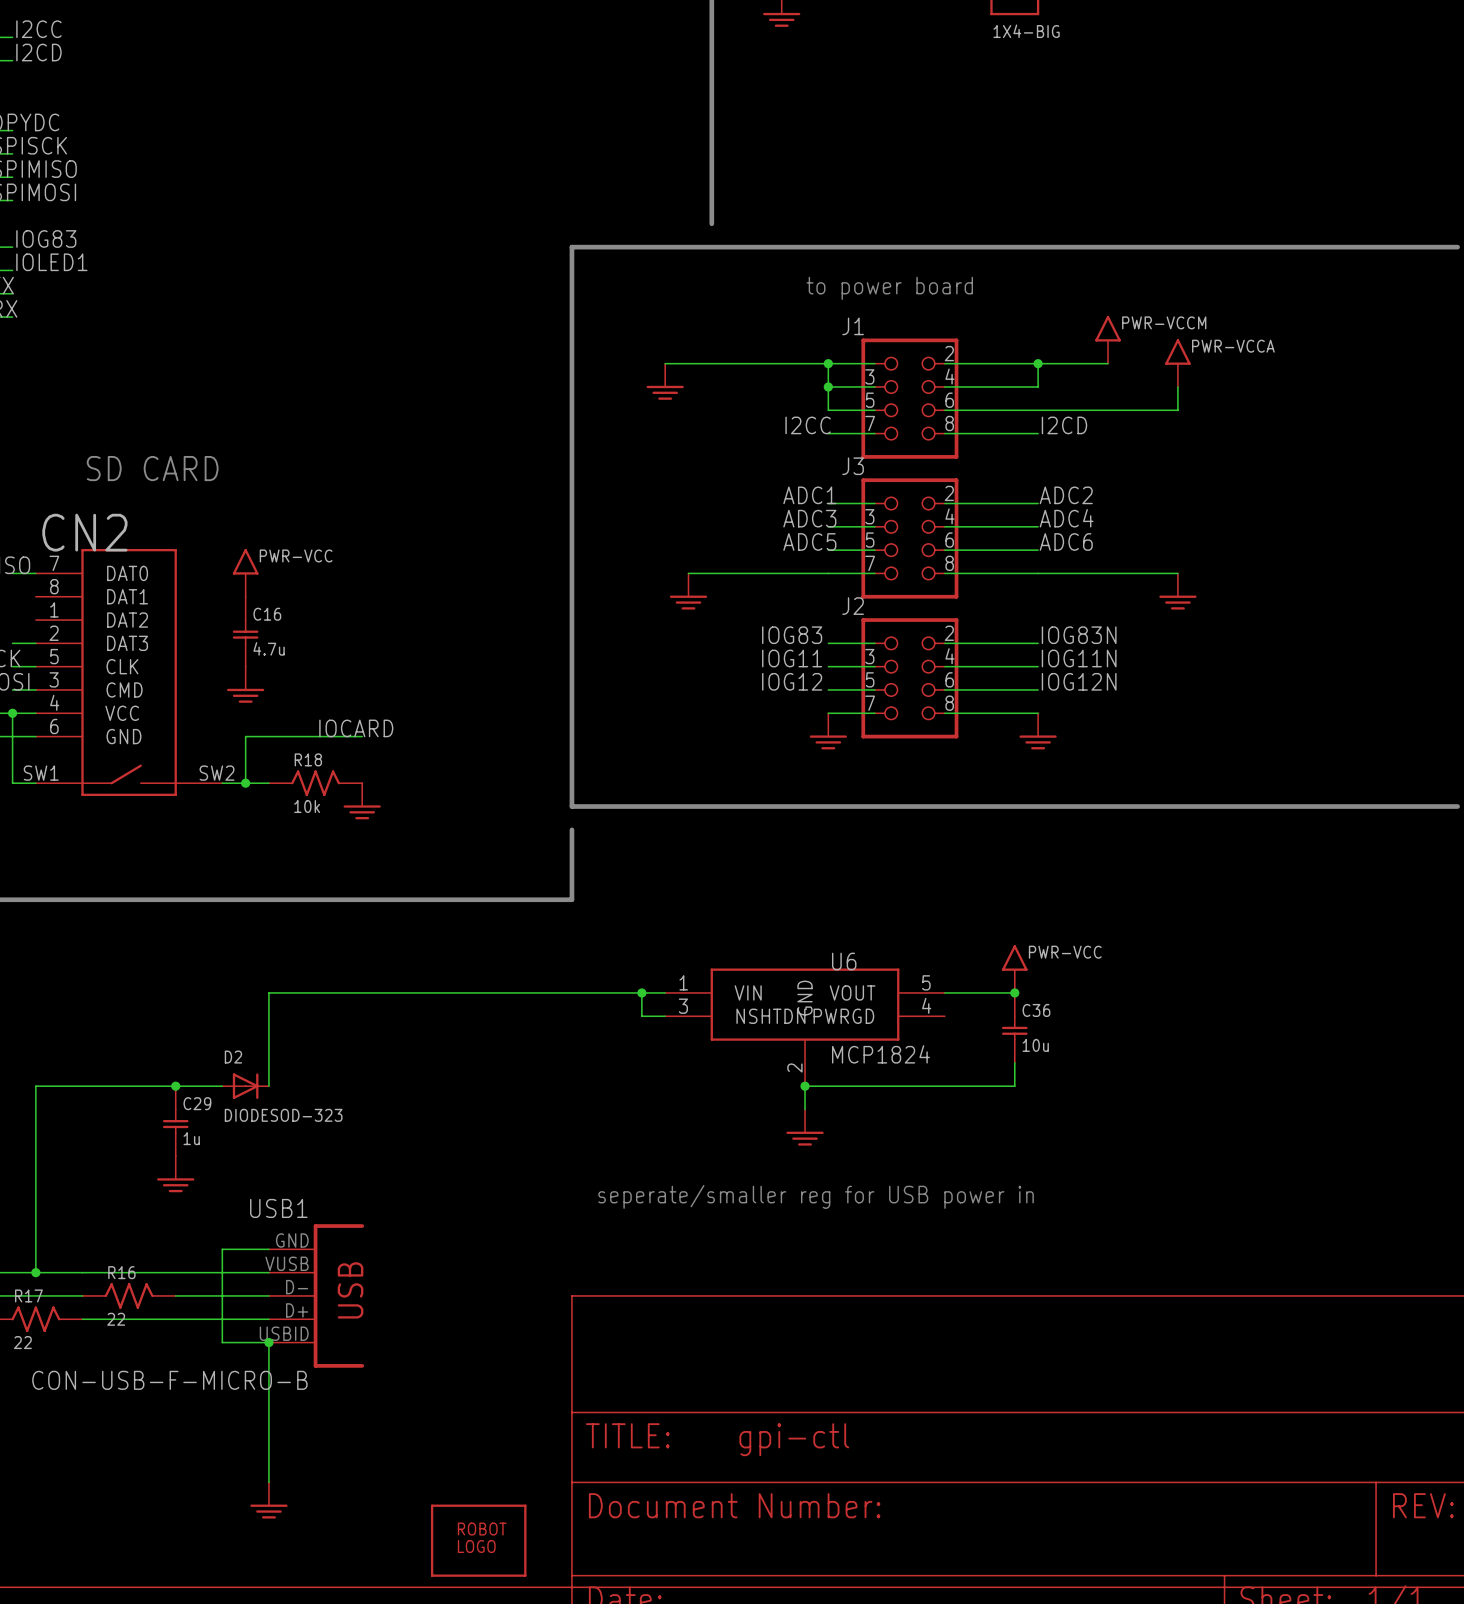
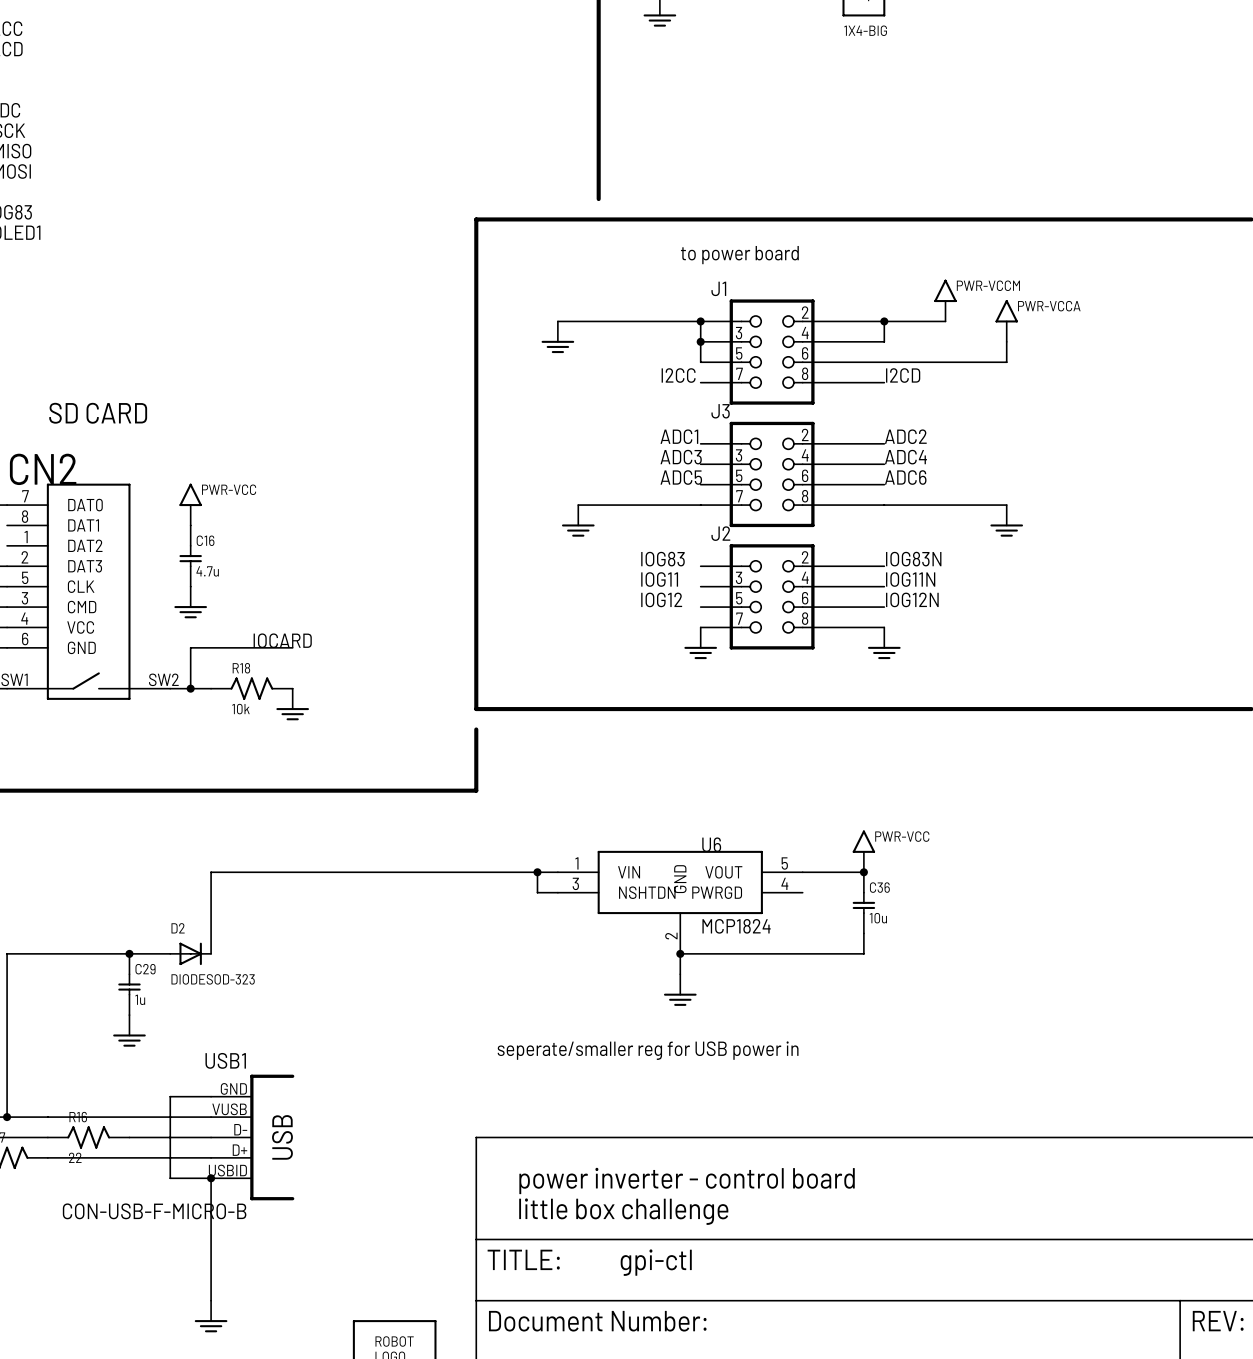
text: none -> power inverter - control board (687, 1180)
text: none -> little box challenge (623, 1211)

